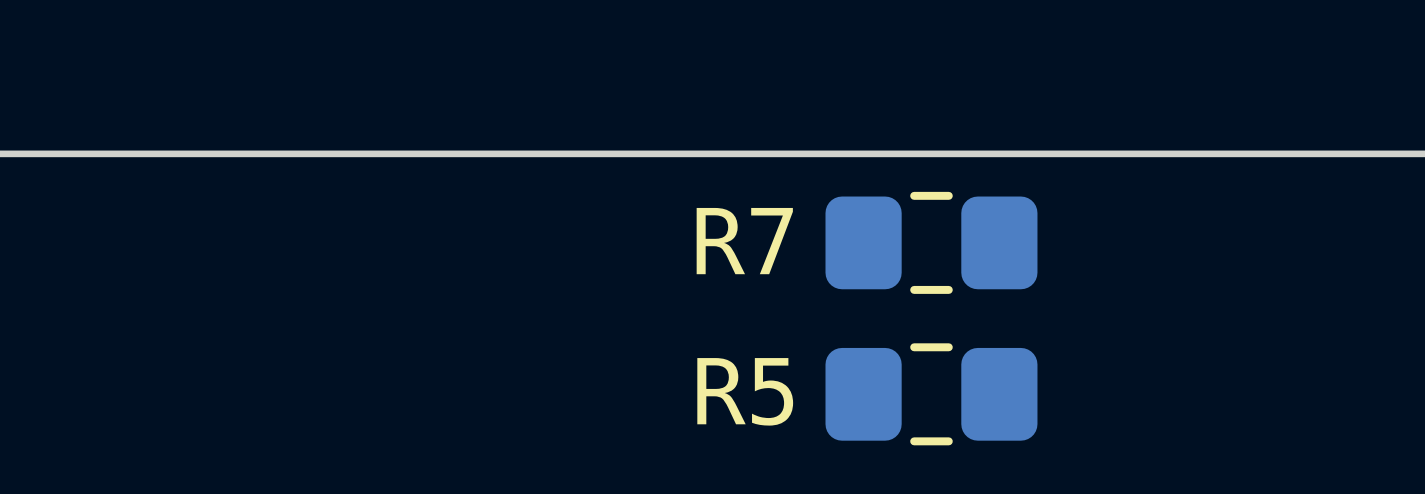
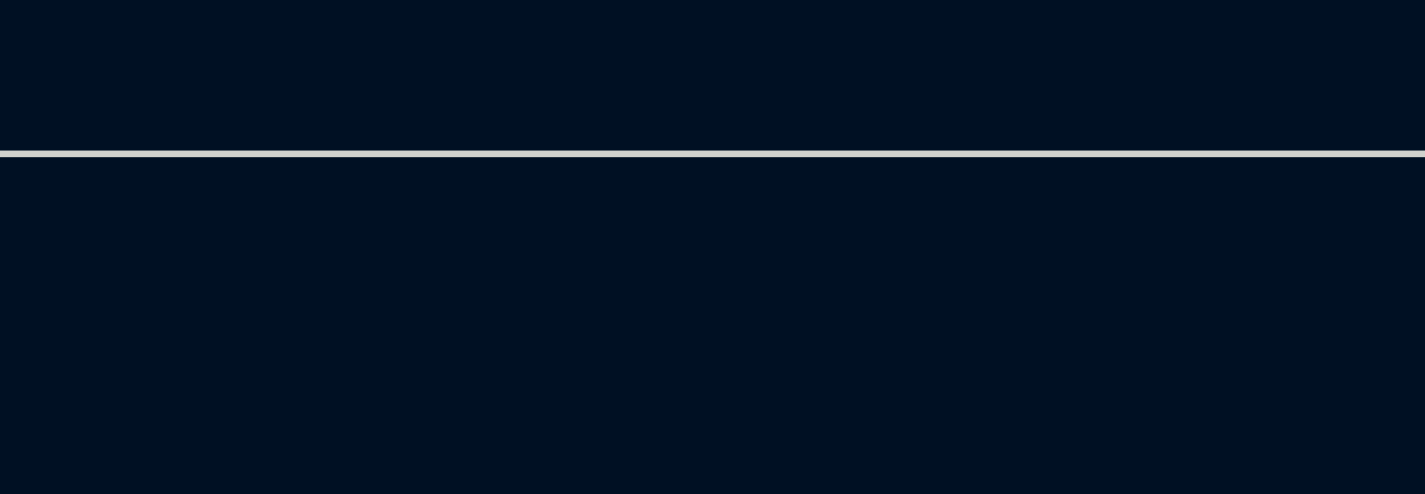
R7: (931, 242) -> none
R5: (931, 394) -> none

